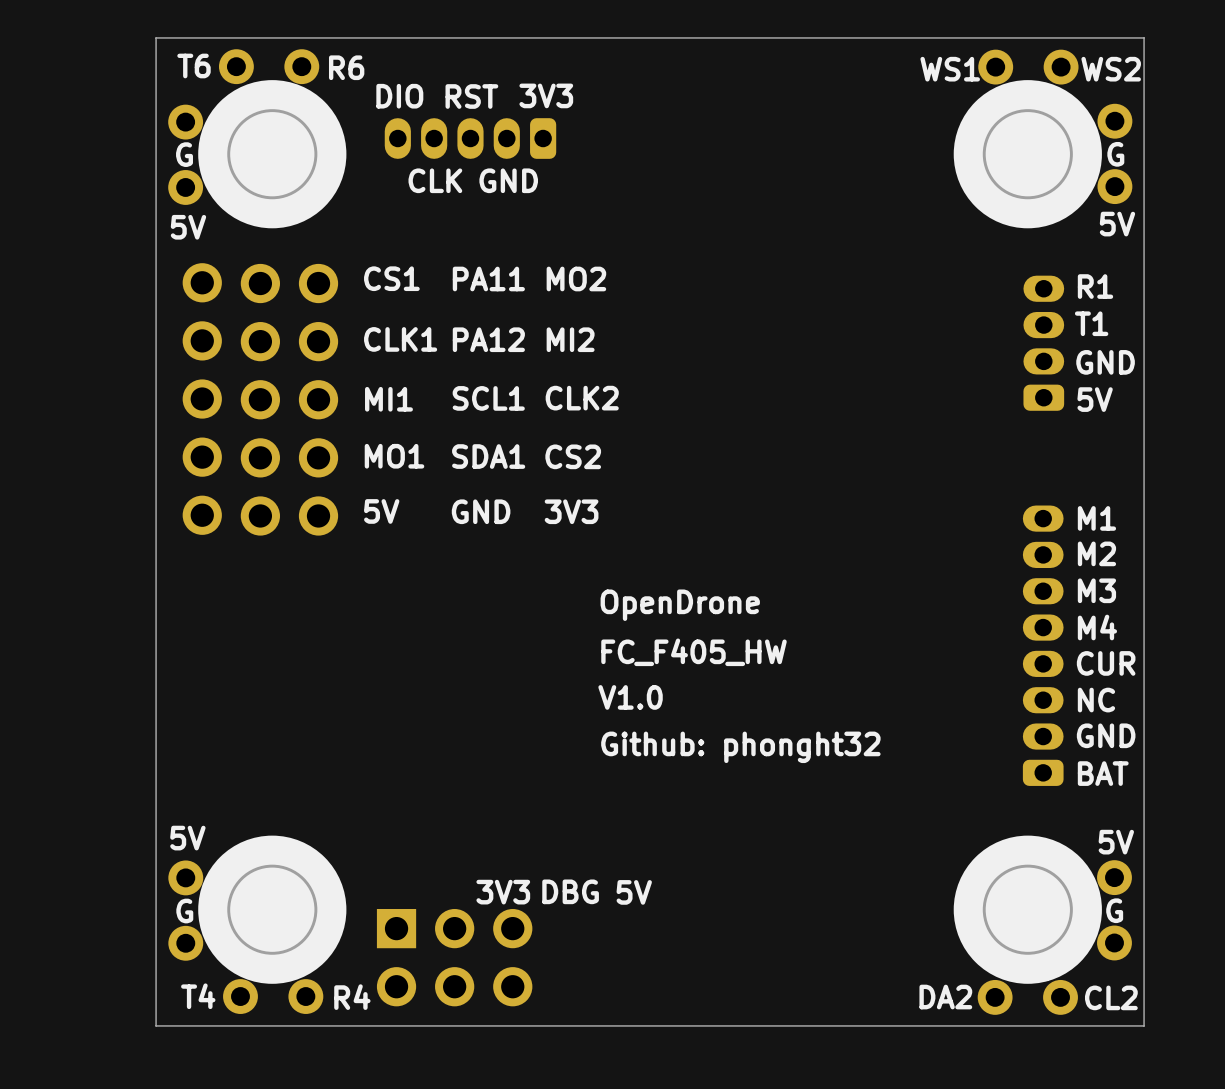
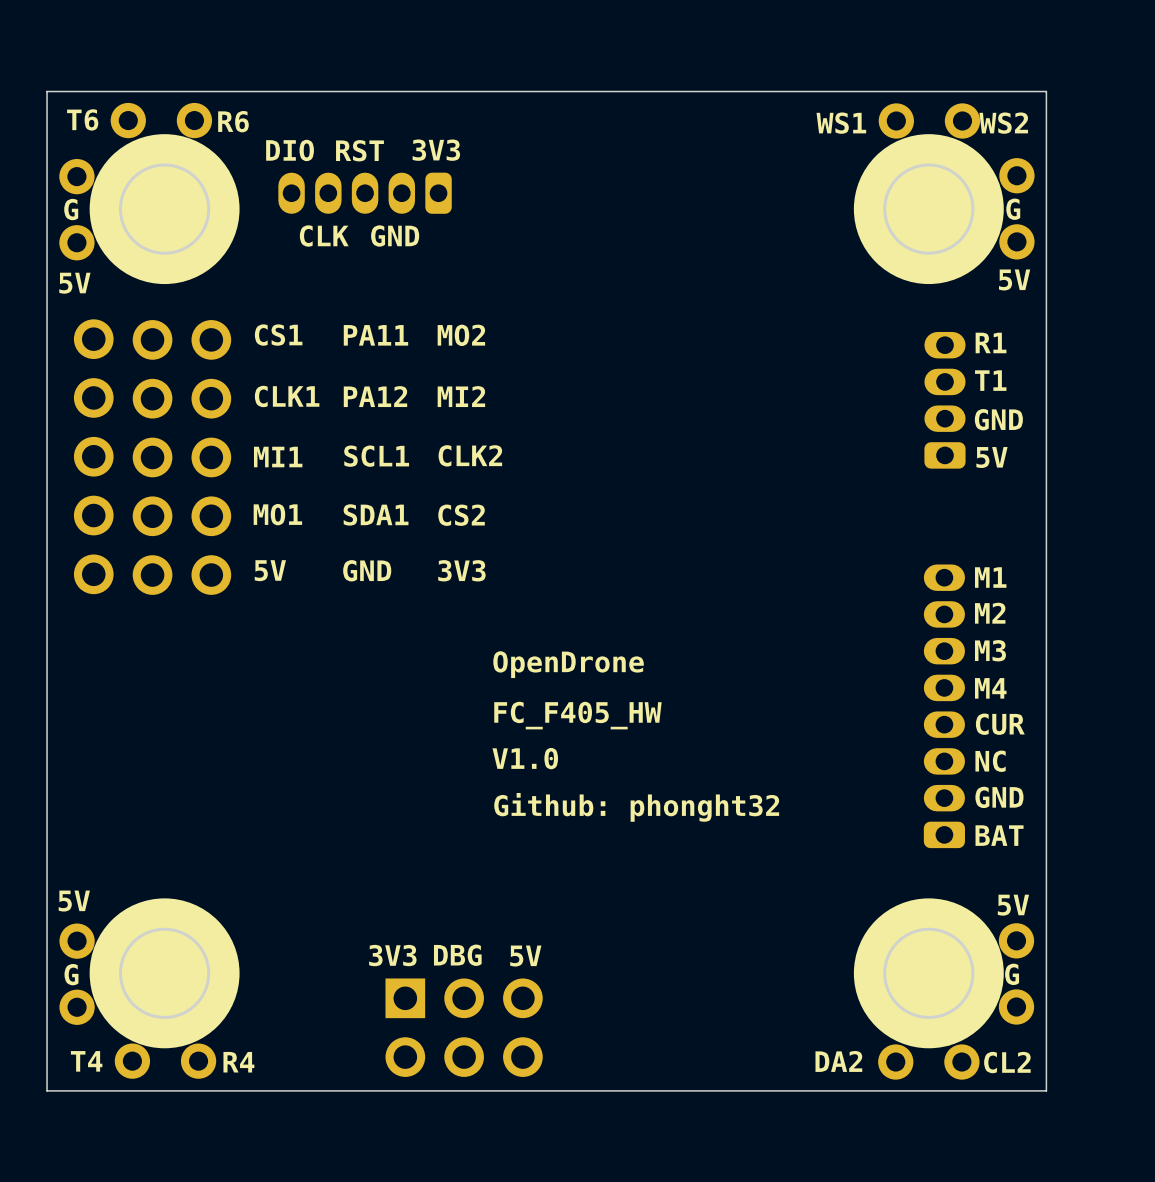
part position: (454, 957) -> (464, 1027)

